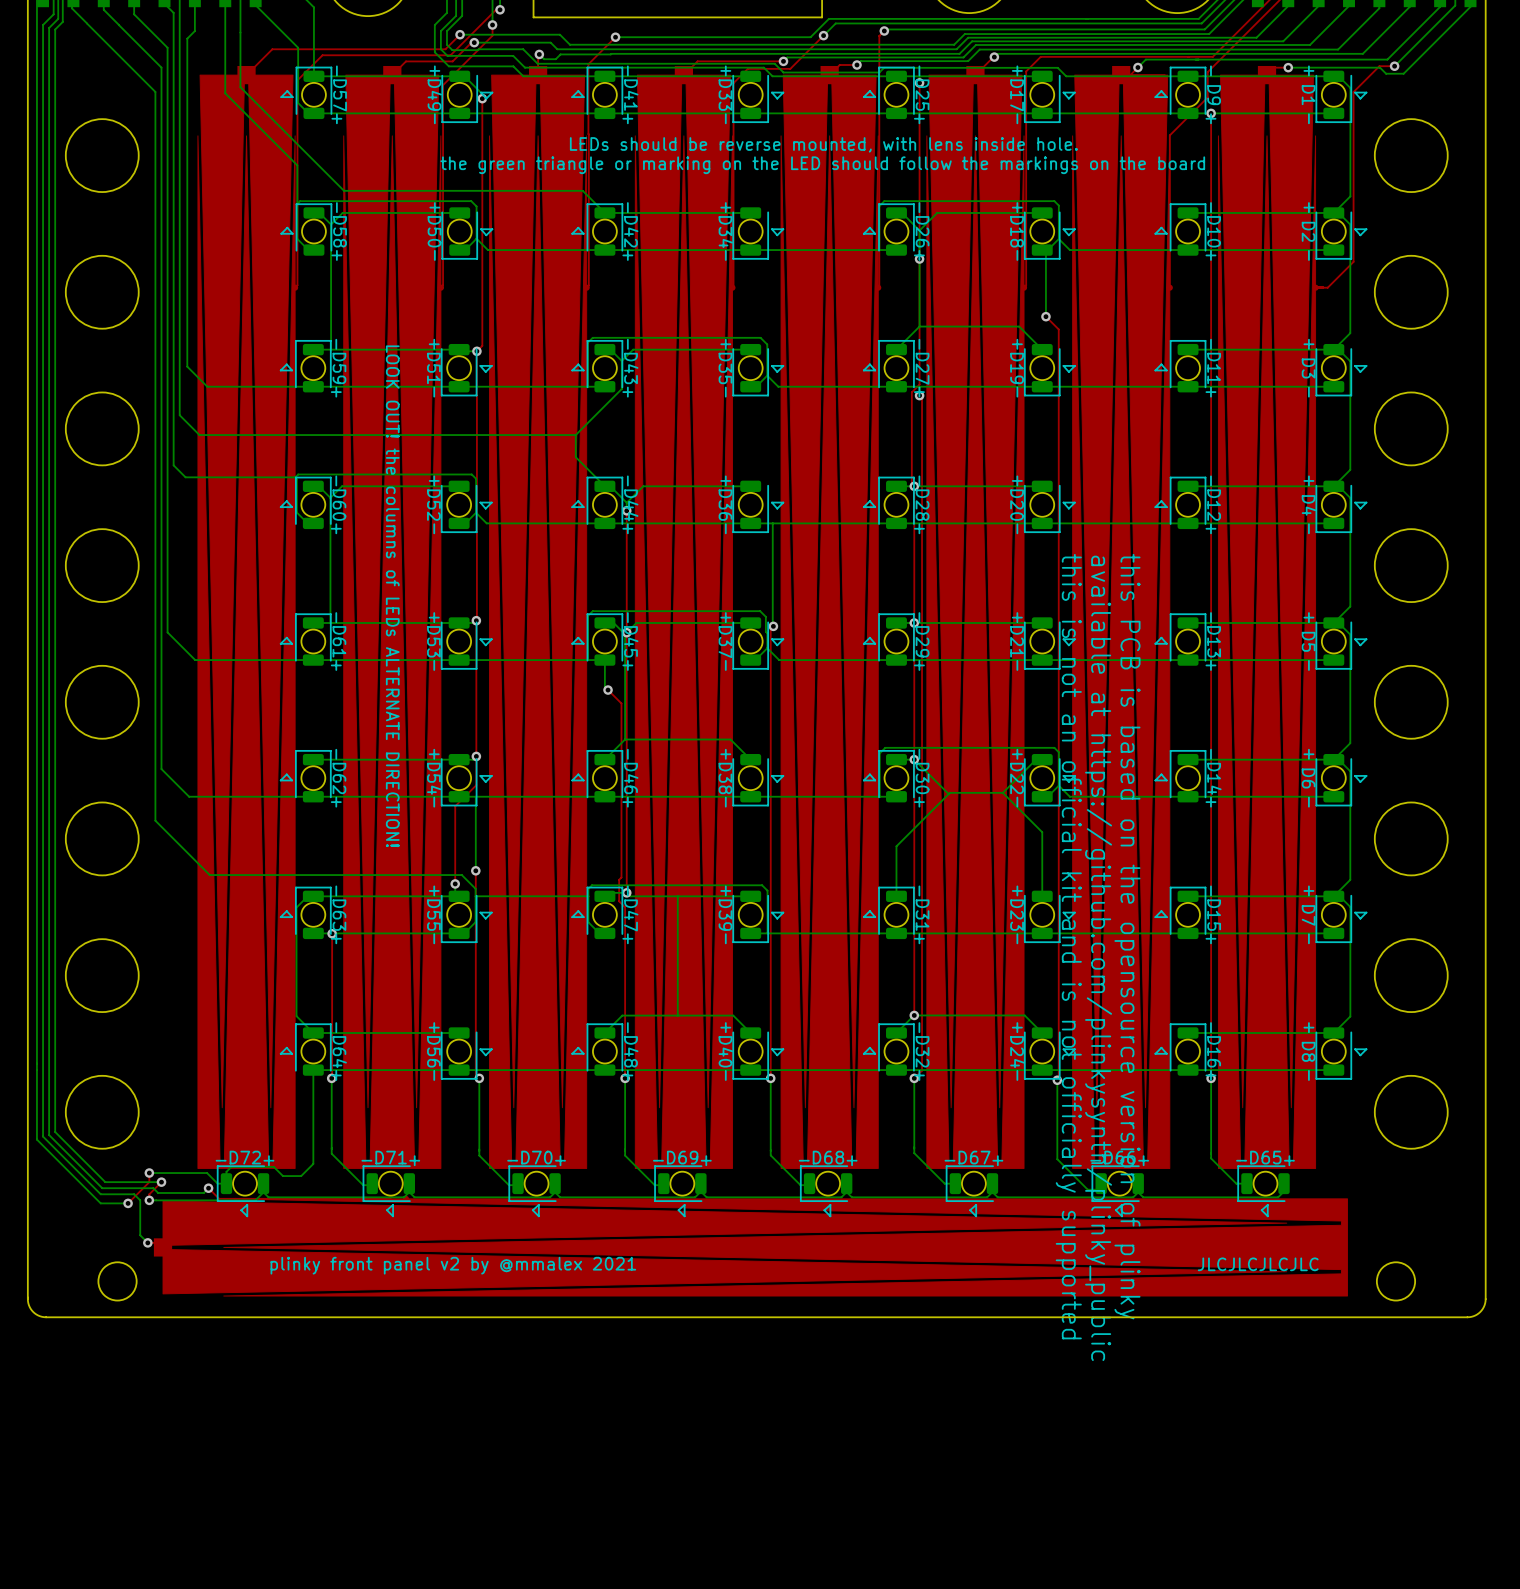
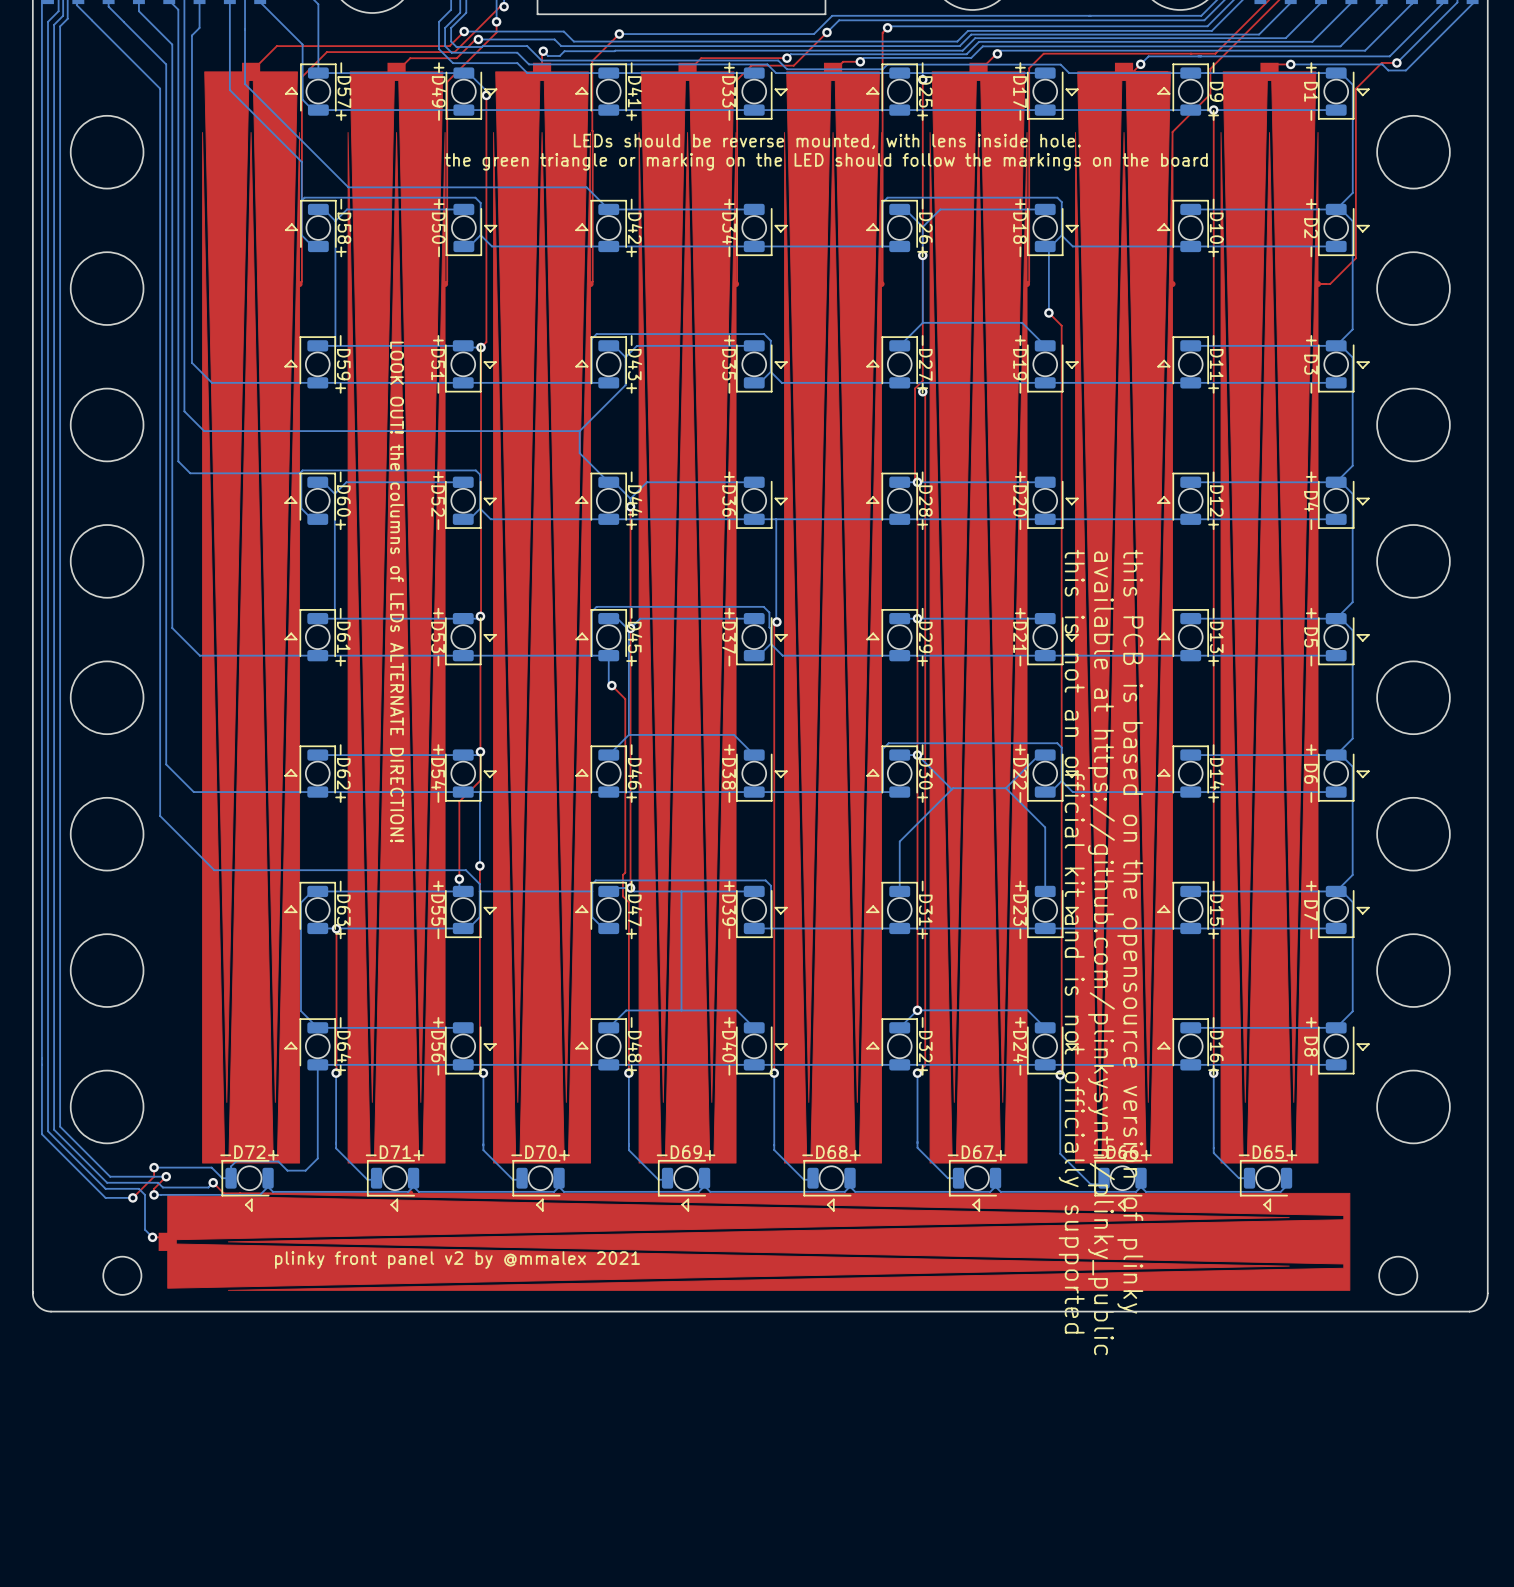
text: JLCJLCJLCJLC (1258, 1264) -> none

